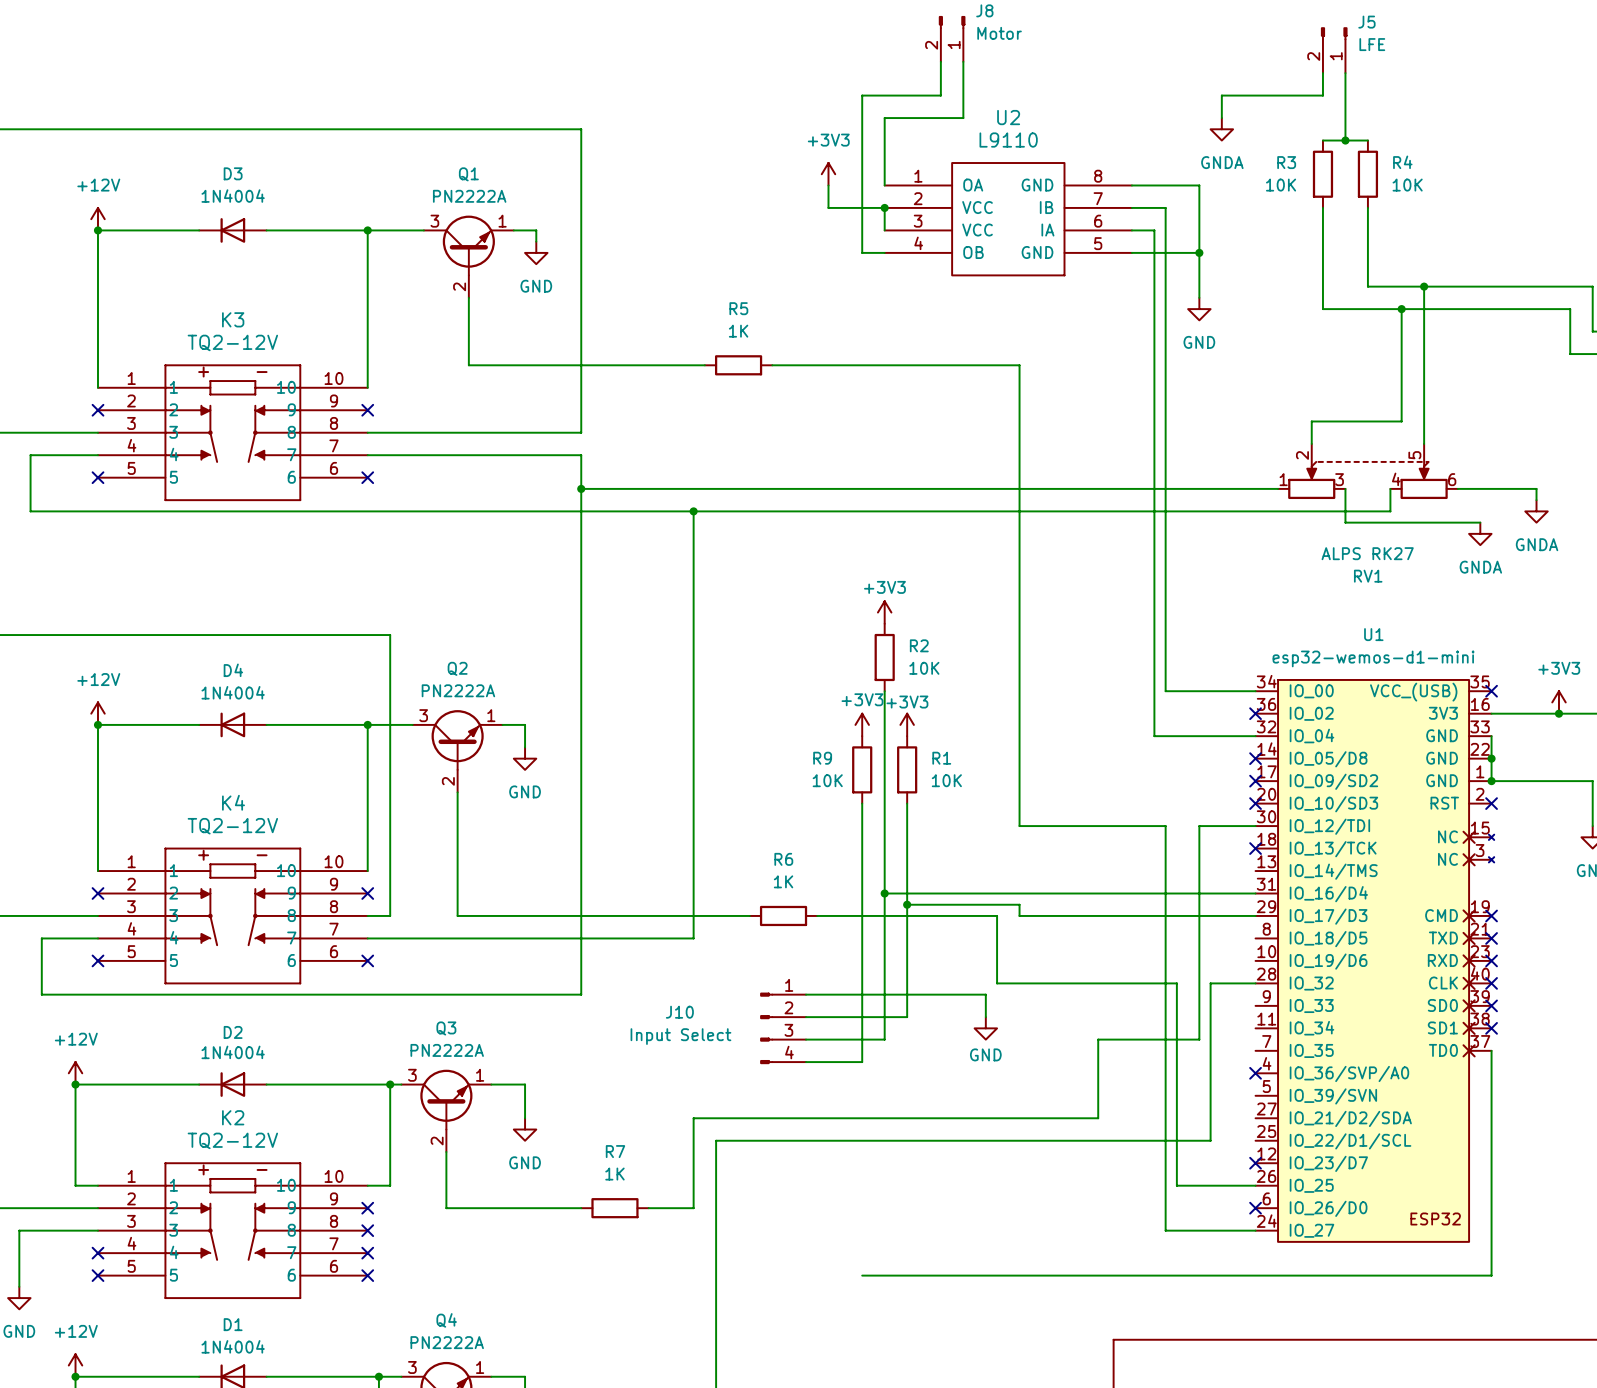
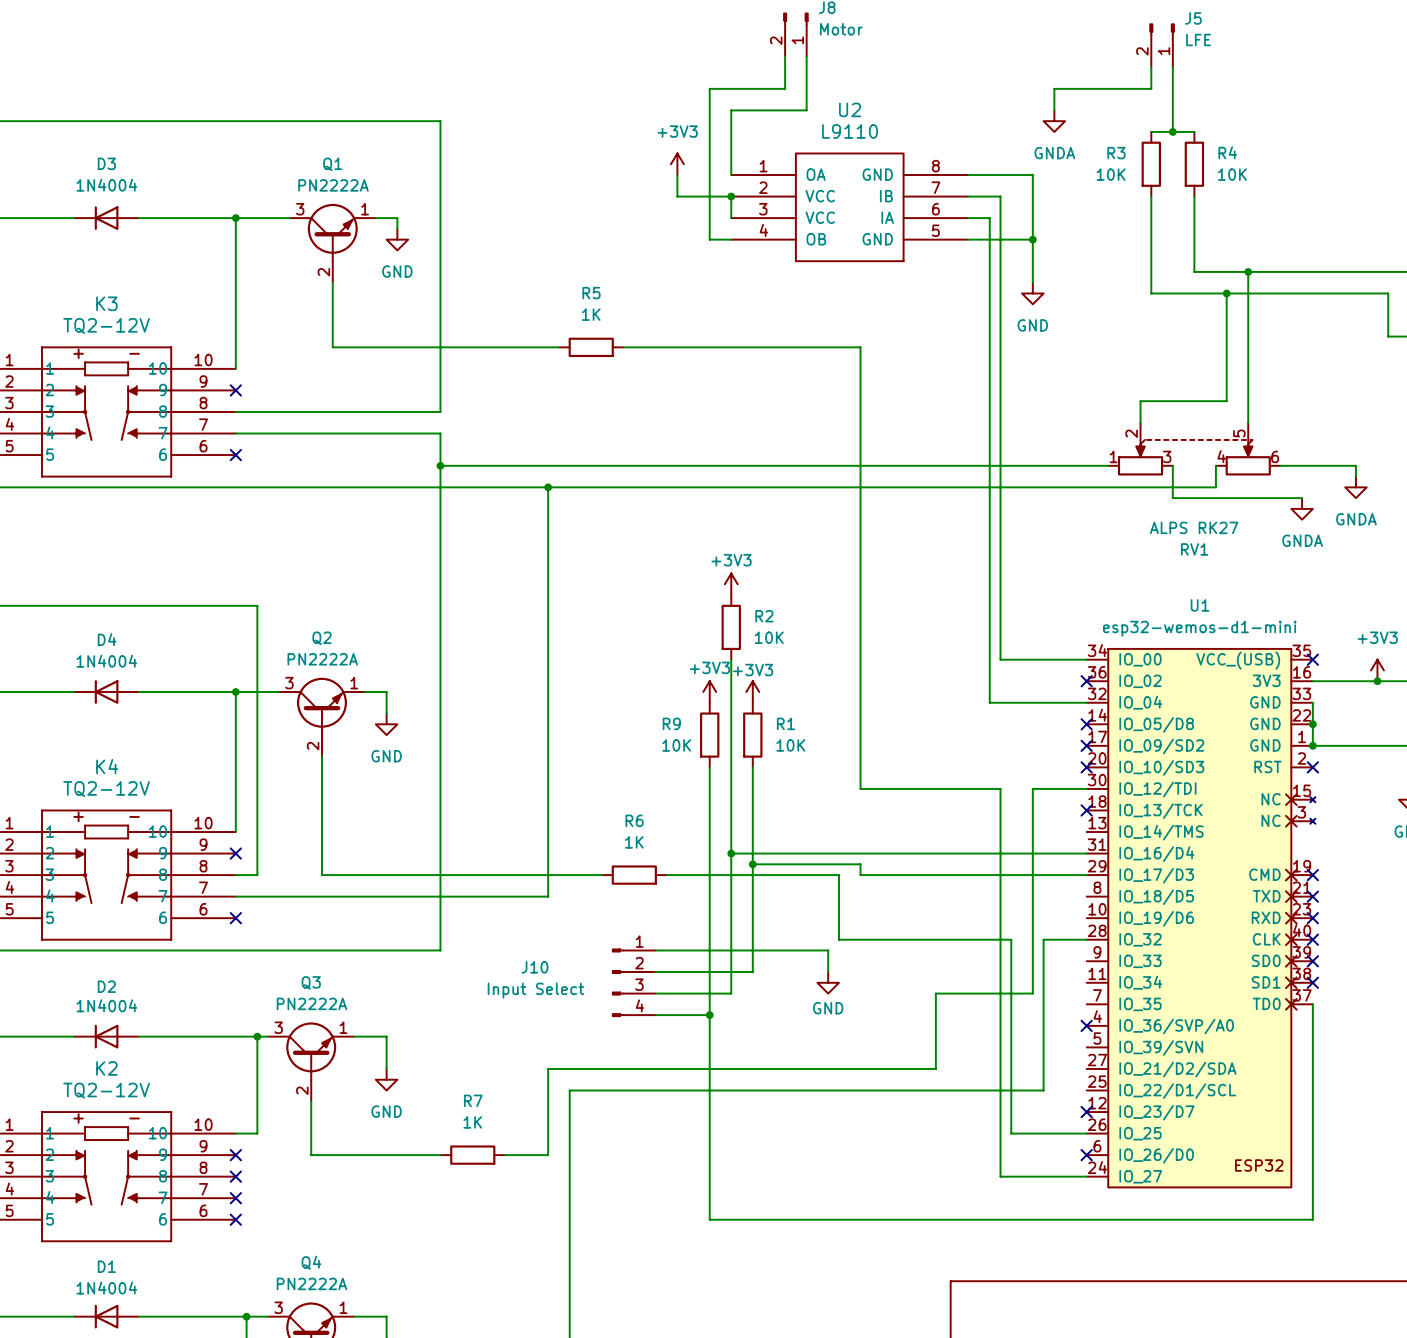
wire: none -> (709, 1015) (709, 1219)
junction: none -> (709, 1015)

